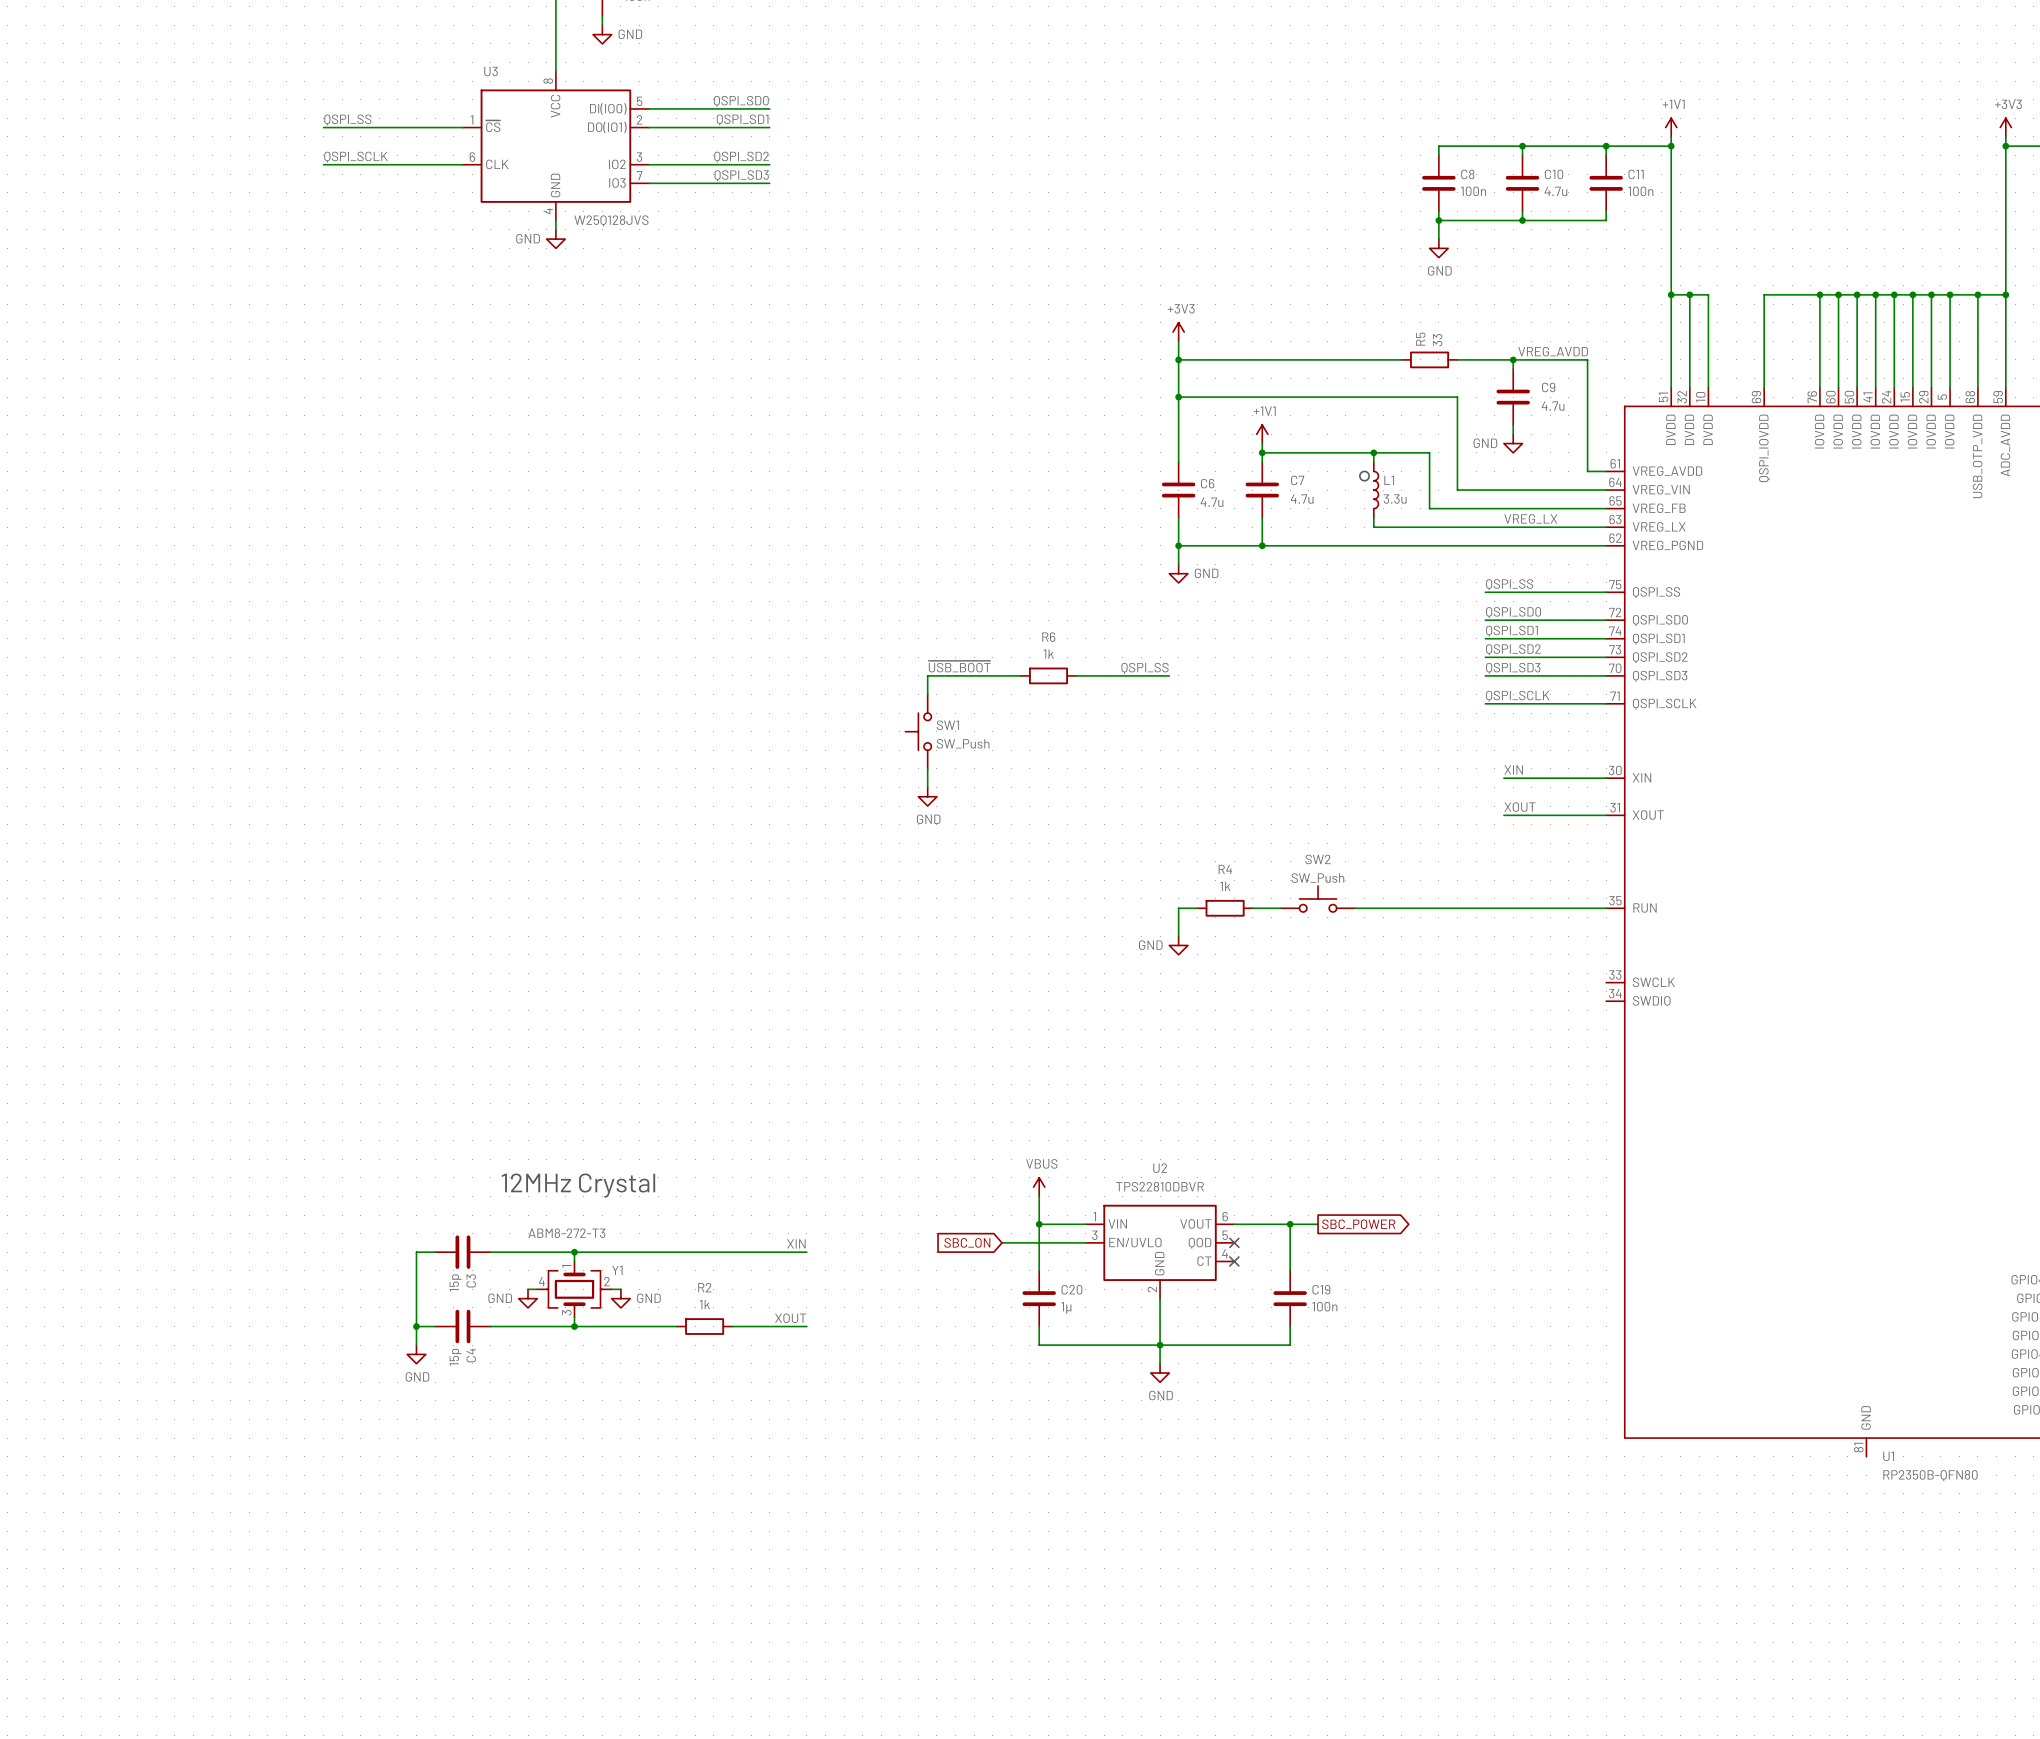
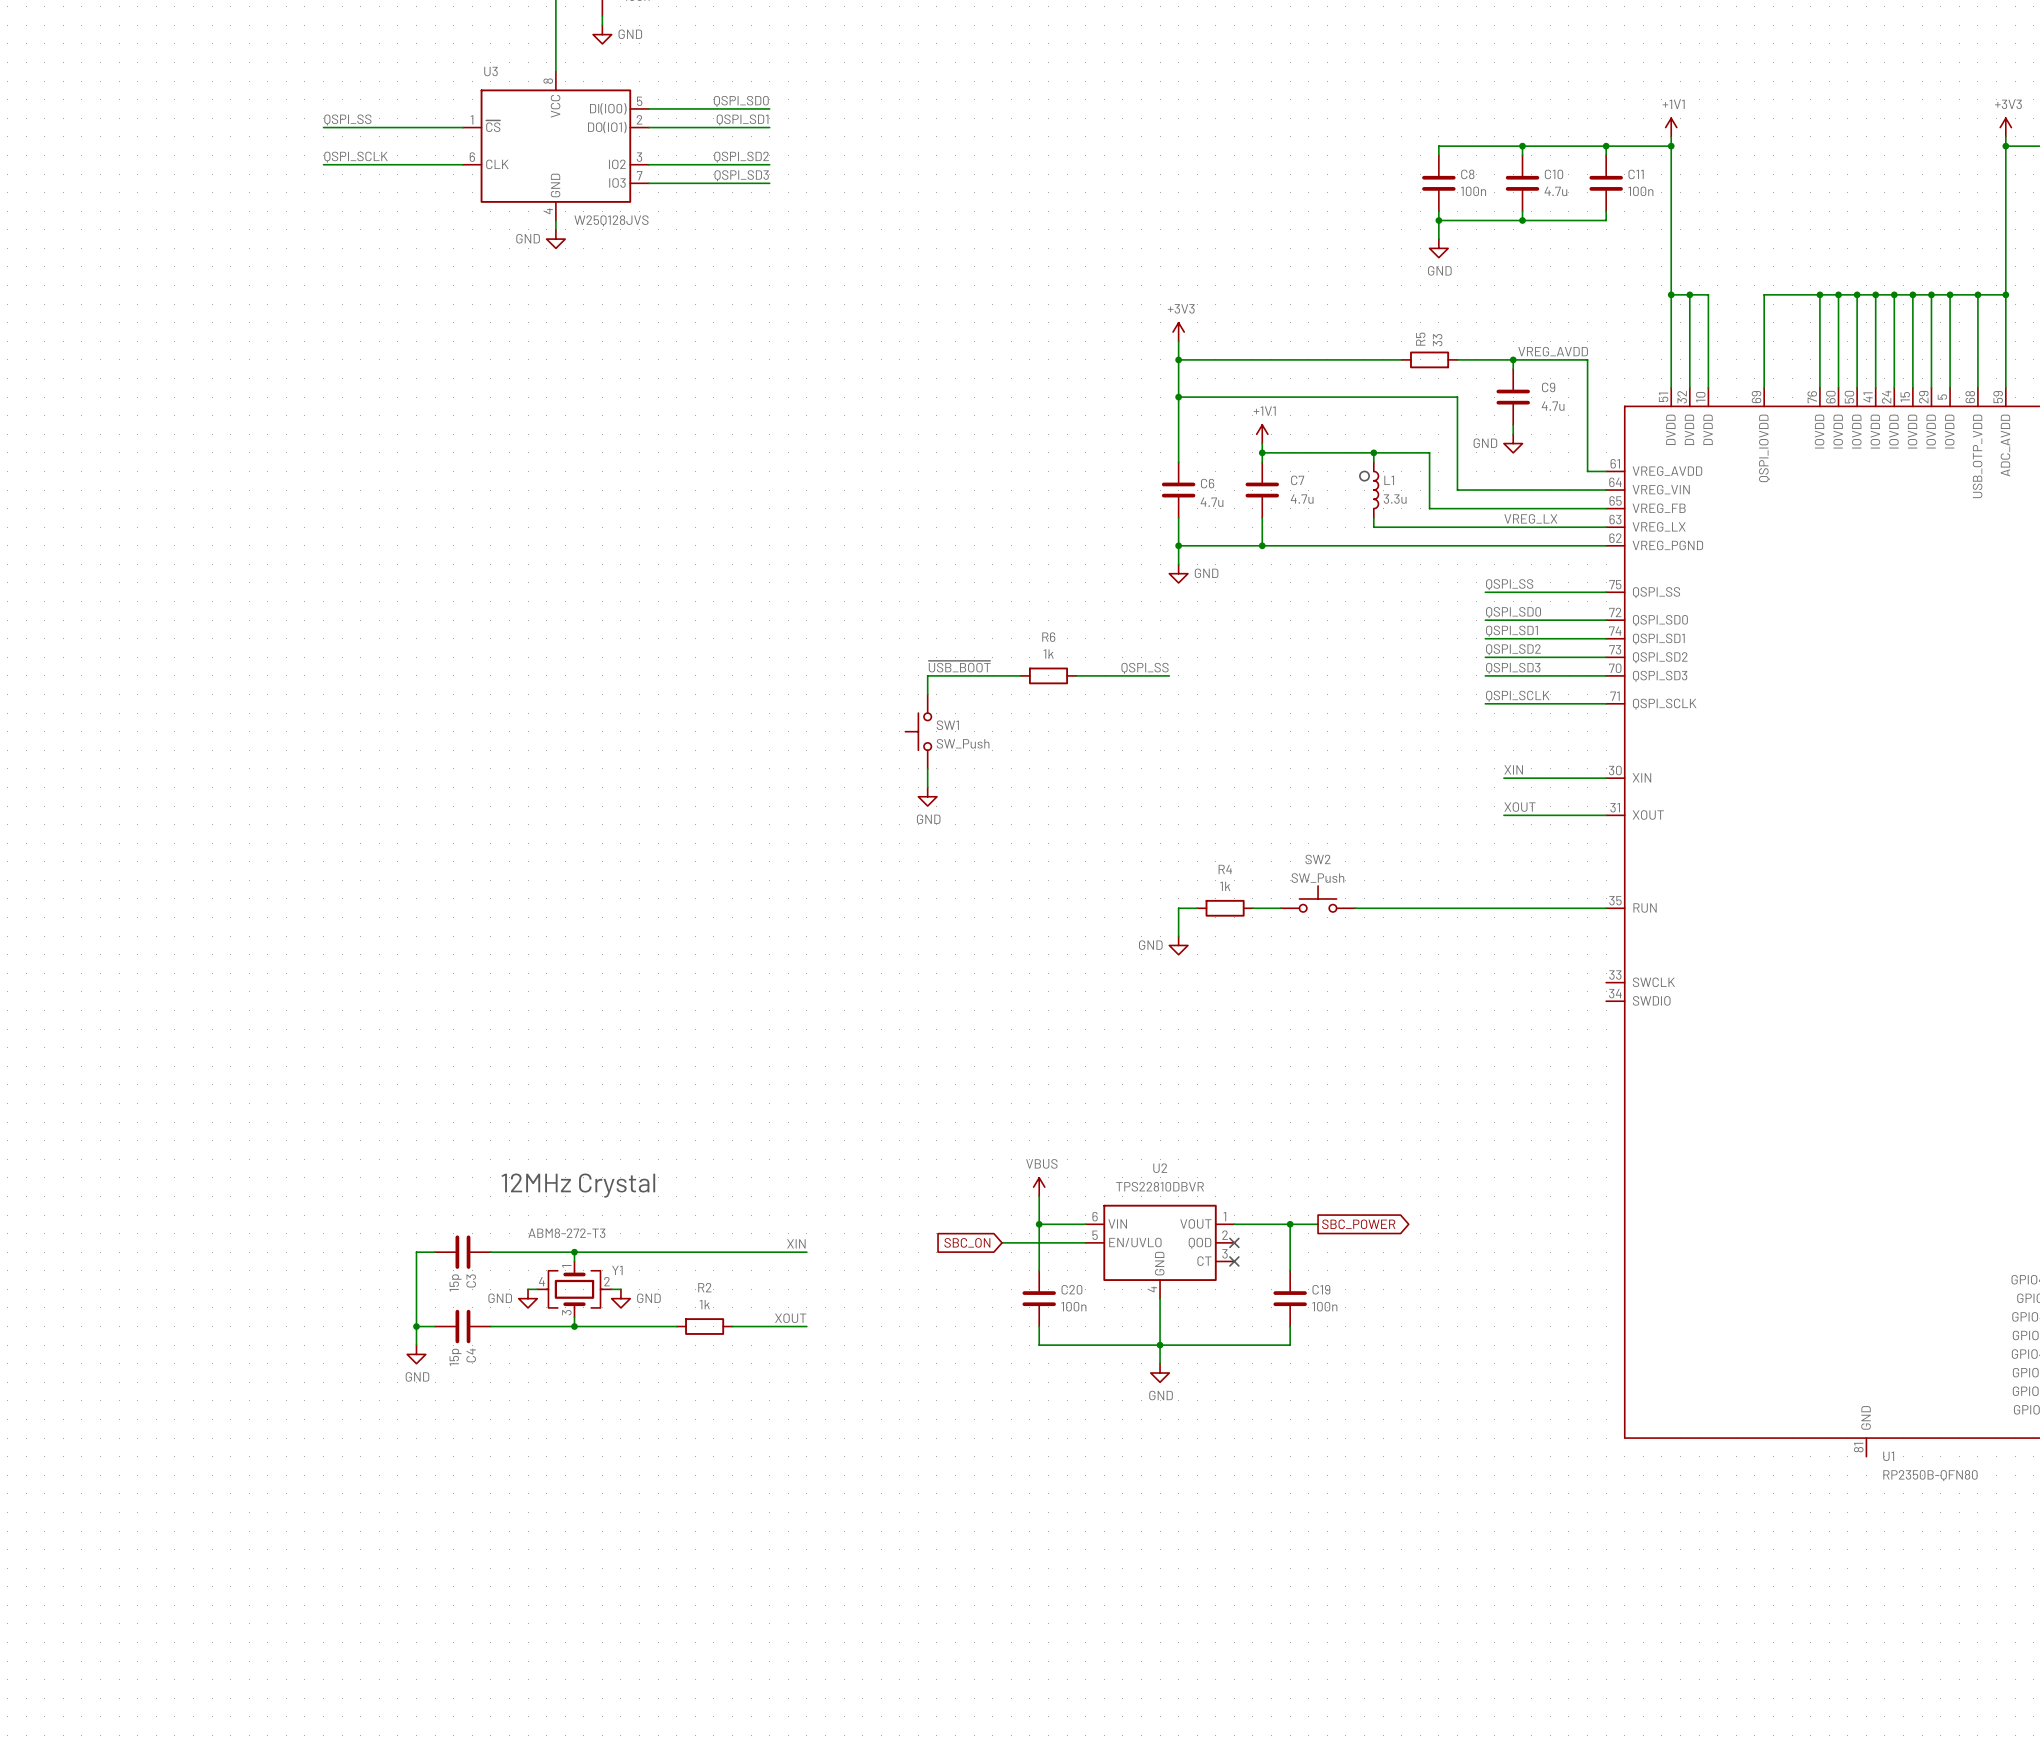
U2 pin number: 1 (1094, 1216) -> 6 (1095, 1216)
U2 pin number: 6 (1225, 1216) -> 1 (1224, 1216)
U2 pin number: 3 (1094, 1235) -> 5 (1095, 1235)
U2 pin number: 5 (1225, 1235) -> 2 (1225, 1235)
U2 pin number: 4 (1225, 1253) -> 3 (1224, 1253)
U2 pin number: 2 (1152, 1289) -> 4 (1152, 1289)
C20 value: 1µ (1066, 1307) -> 100n (1073, 1306)

